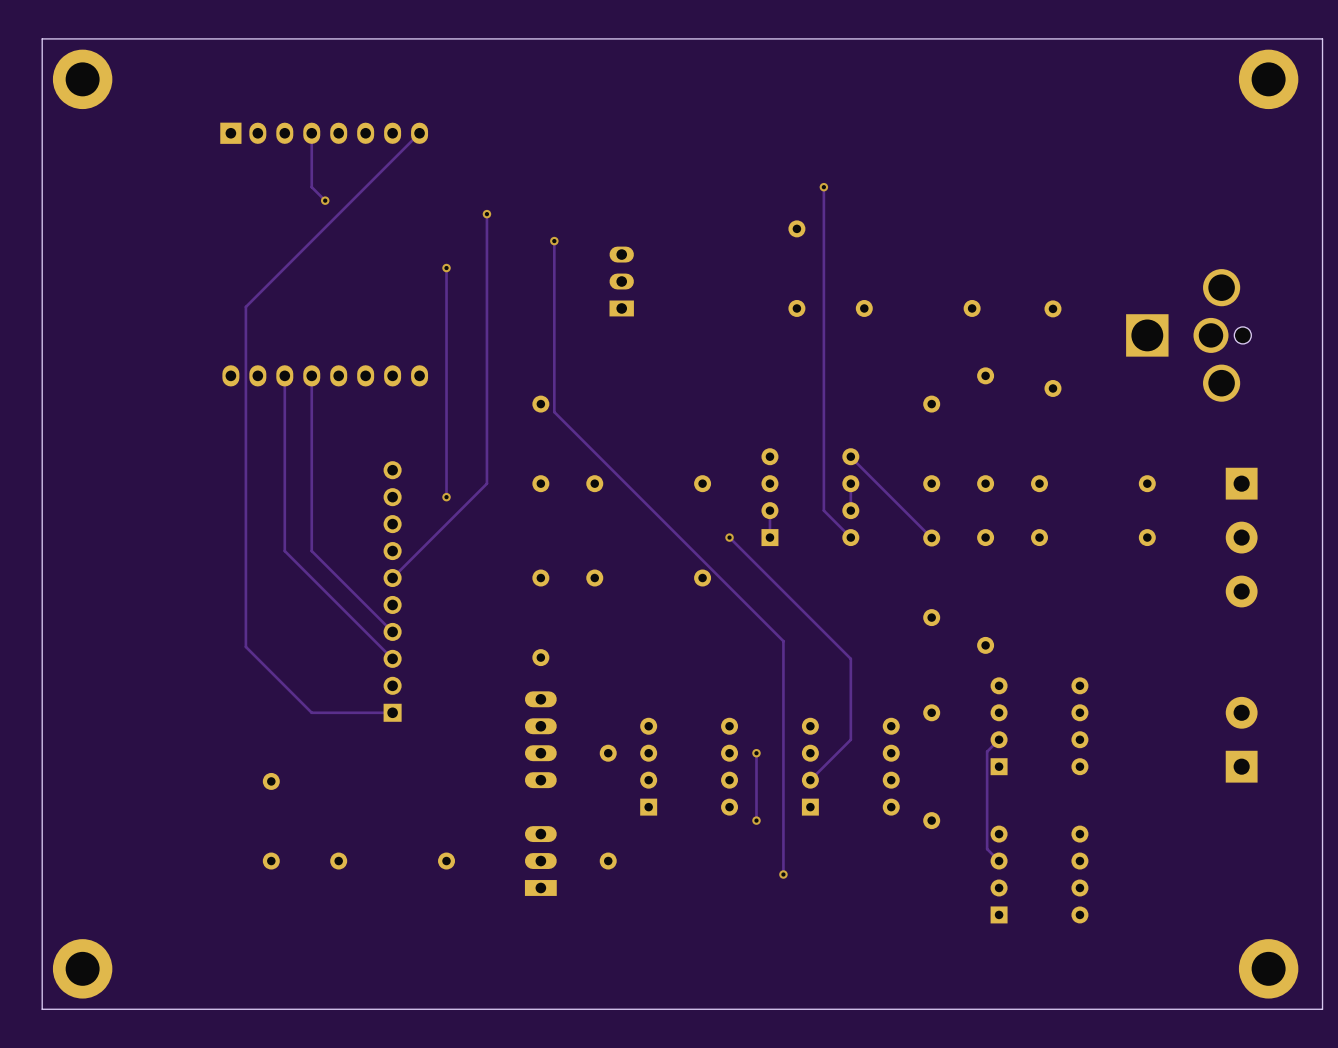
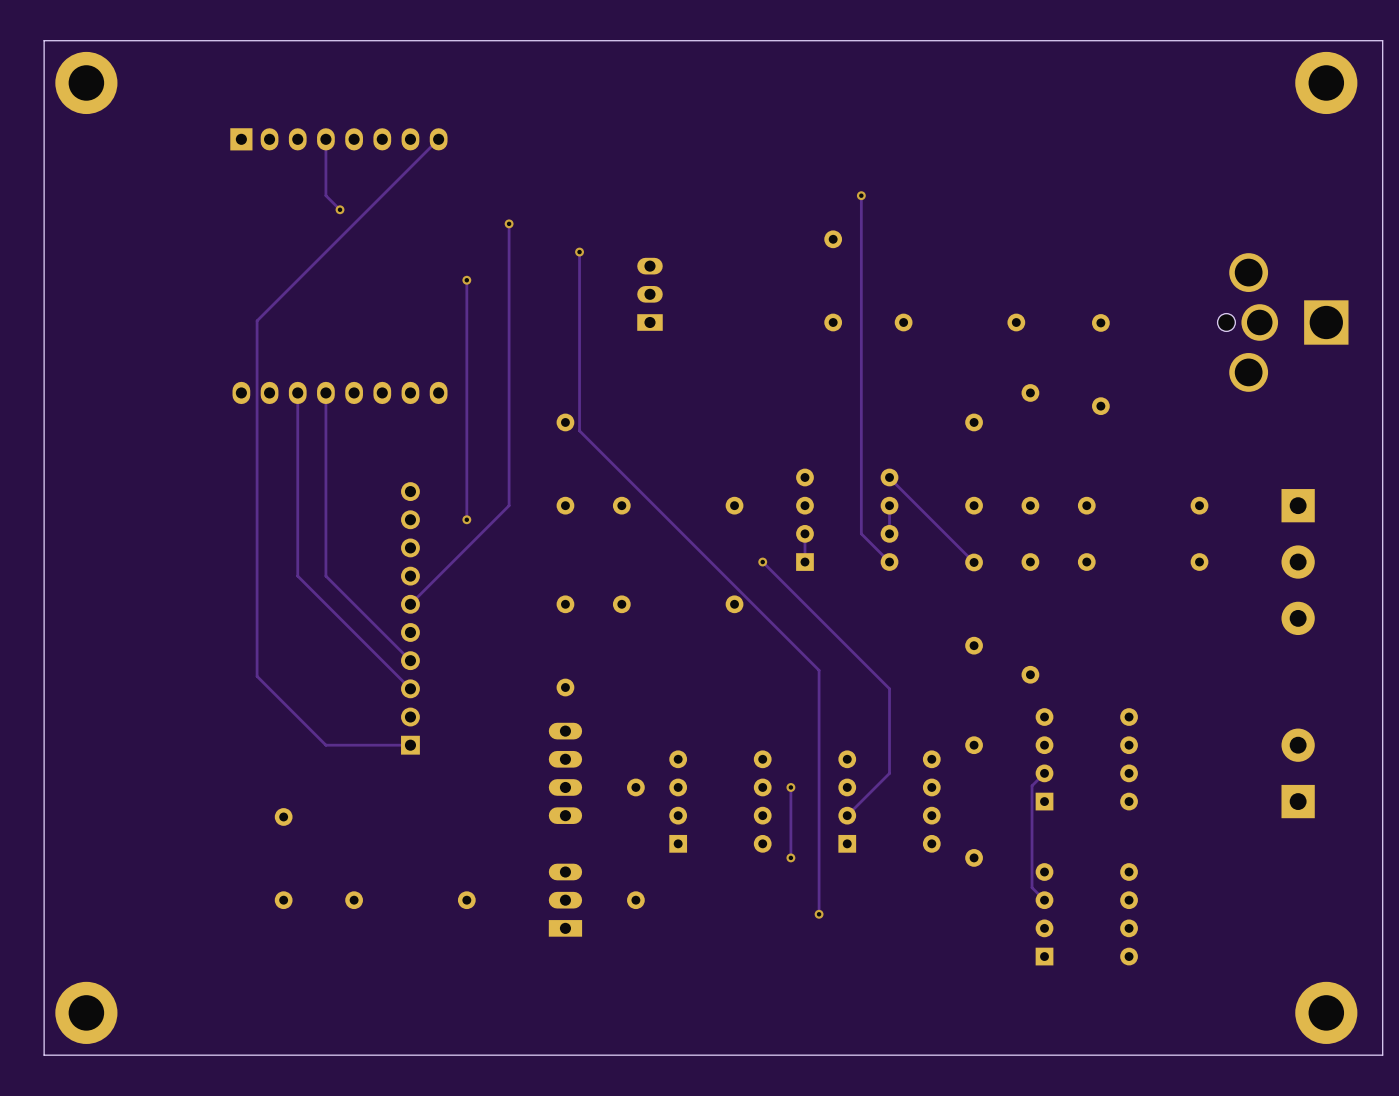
part rotation: 0° (1188, 335) -> 180° (1283, 322)

